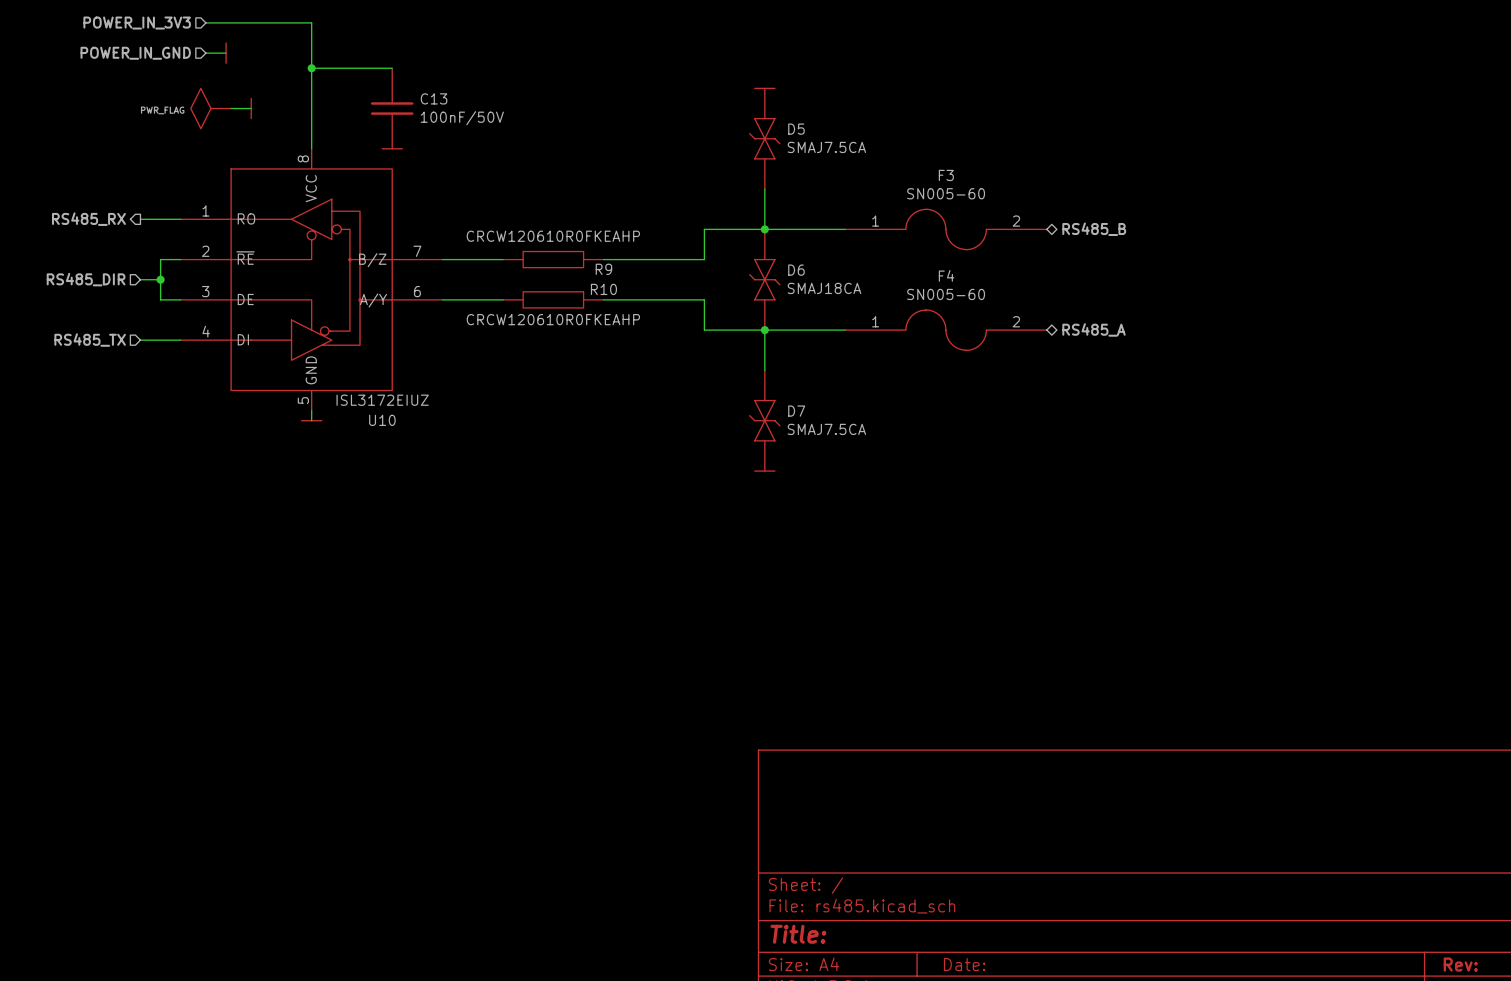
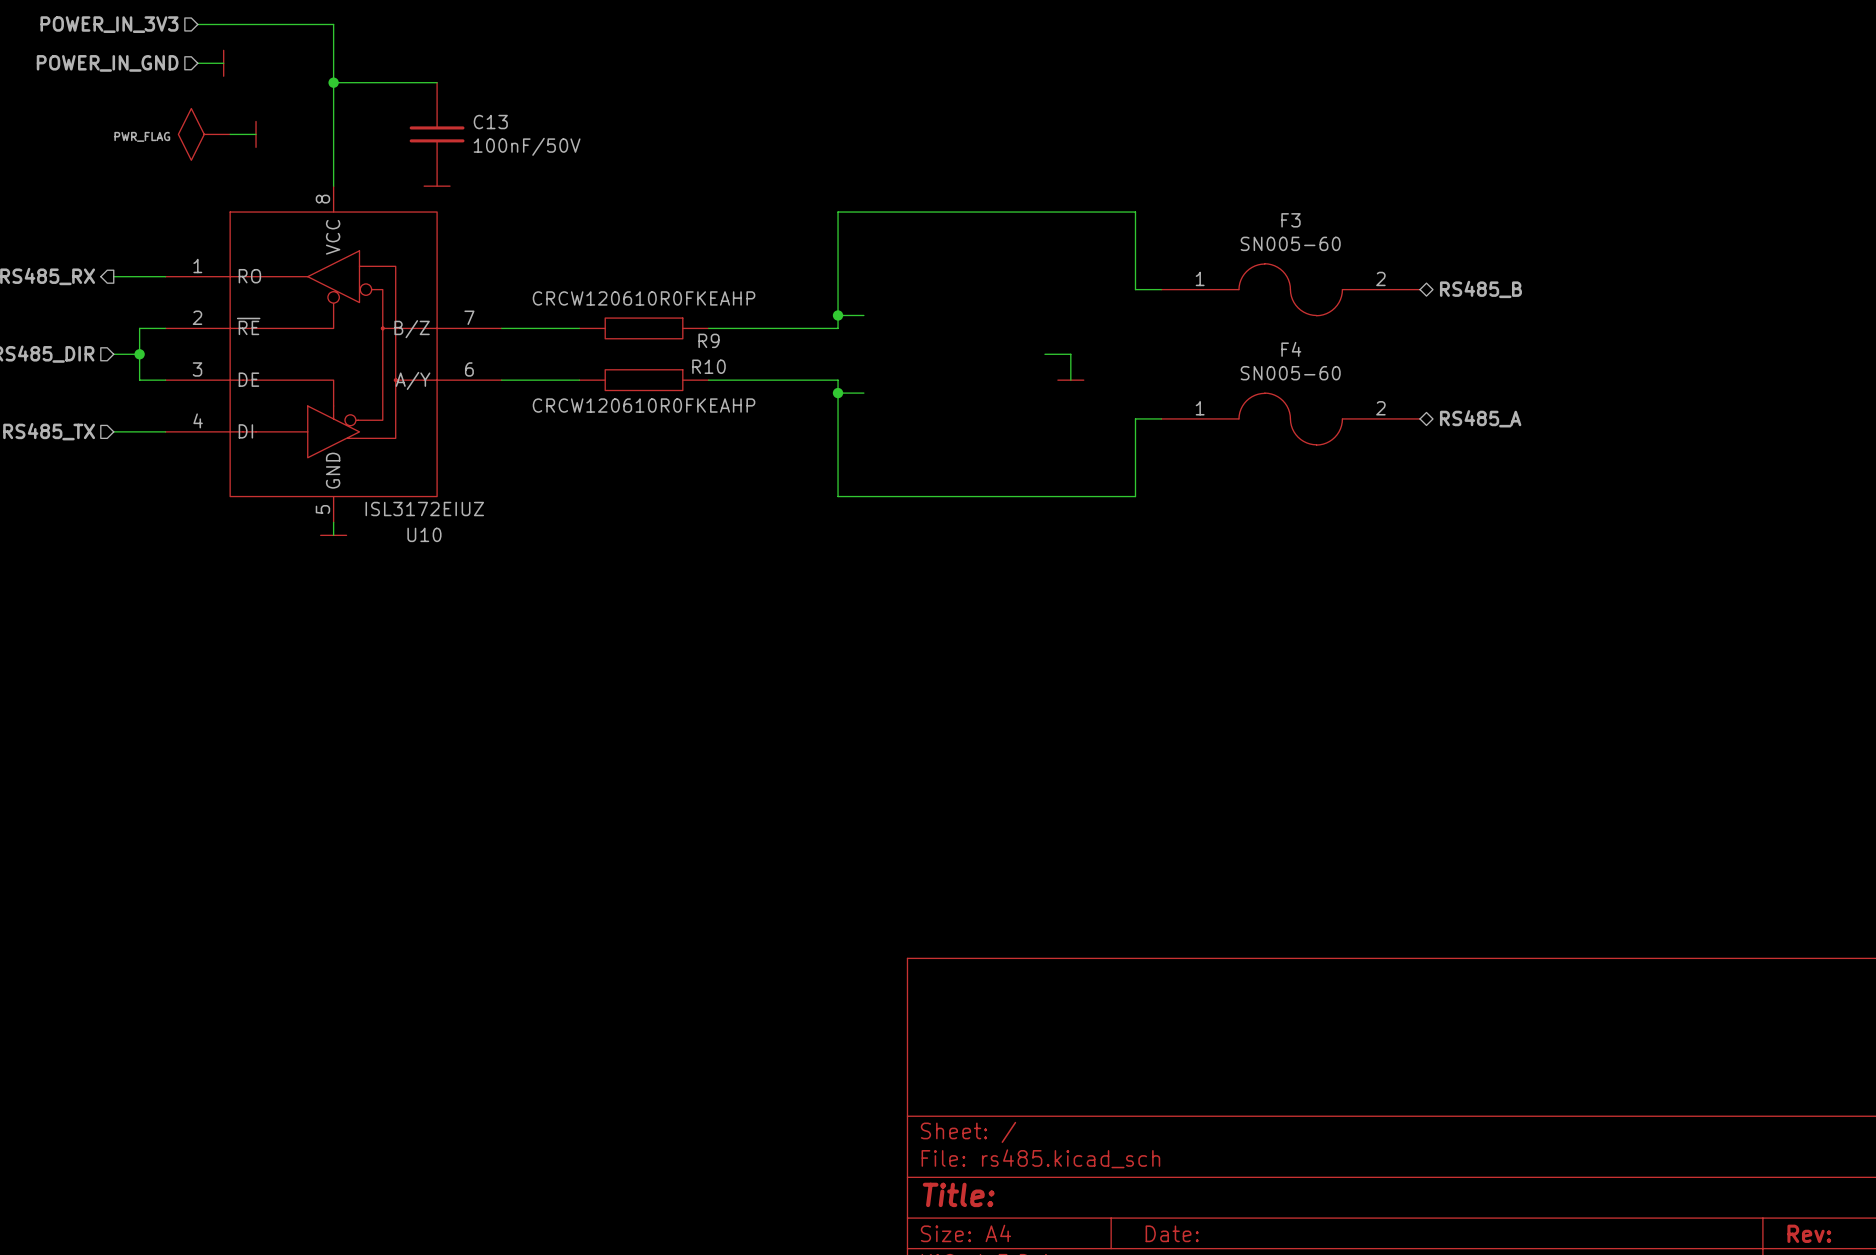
power symbol: (764, 88) -> none
D5: SMAJ7.5CA (764, 138) -> none
wire: (764, 189) (764, 229) -> none
wire: (704, 229) (845, 229) -> (838, 289) (838, 212) (1135, 212) (1135, 289) (1161, 289)
junction: (764, 229) -> none
F3 position: (946, 229) -> (1290, 289)
hierarchical label position: RS485_B (1094, 229) -> RS485_B (1480, 289)
wire: none -> (838, 315) (863, 315)
junction: none -> (838, 315)
D6: SMAJ18CA (764, 279) -> none
wire: none -> (1044, 354) (1070, 354) (1070, 380)
power symbol: none -> (1070, 380)
wire: none -> (838, 393) (863, 393)
junction: none -> (838, 393)
hierarchical label position: RS485_A (1094, 329) -> RS485_A (1480, 418)
wire: (704, 330) (845, 330) -> (838, 418) (838, 496) (1135, 496) (1135, 418) (1161, 418)
wire: (764, 330) (764, 370) -> none
junction: (764, 330) -> none
F4 position: (946, 330) -> (1290, 419)
D7: SMAJ7.5CA (764, 420) -> none
power symbol: (764, 471) -> none

